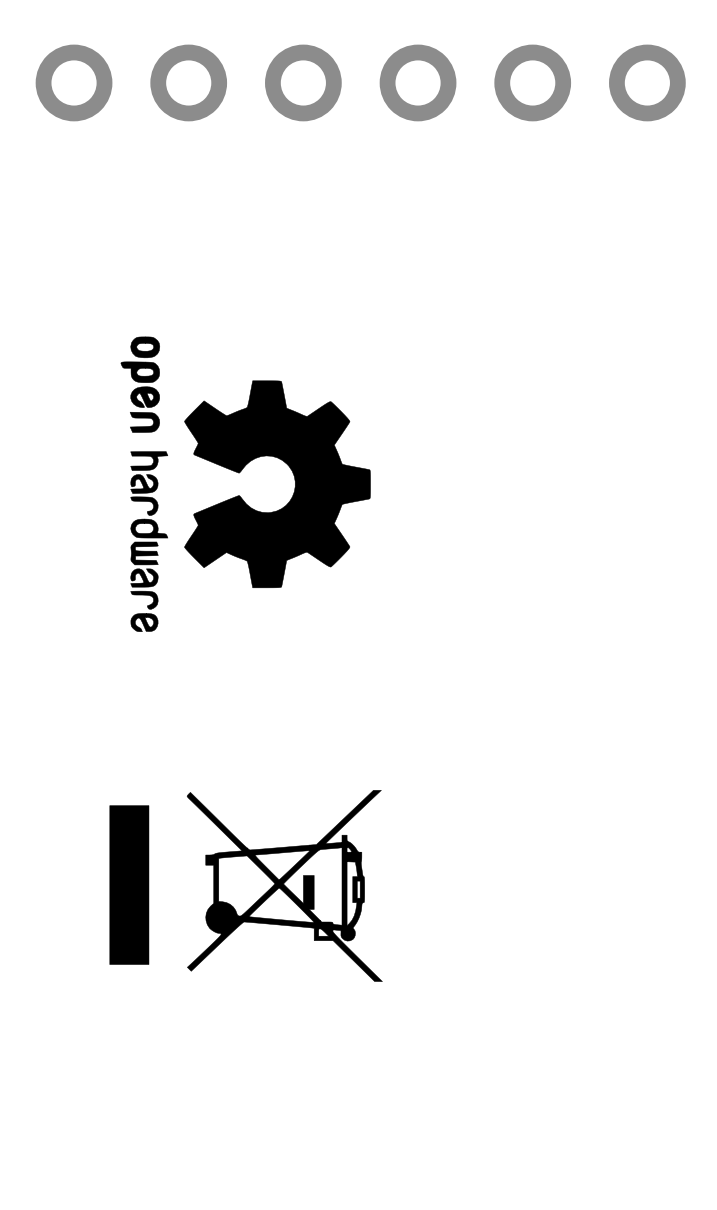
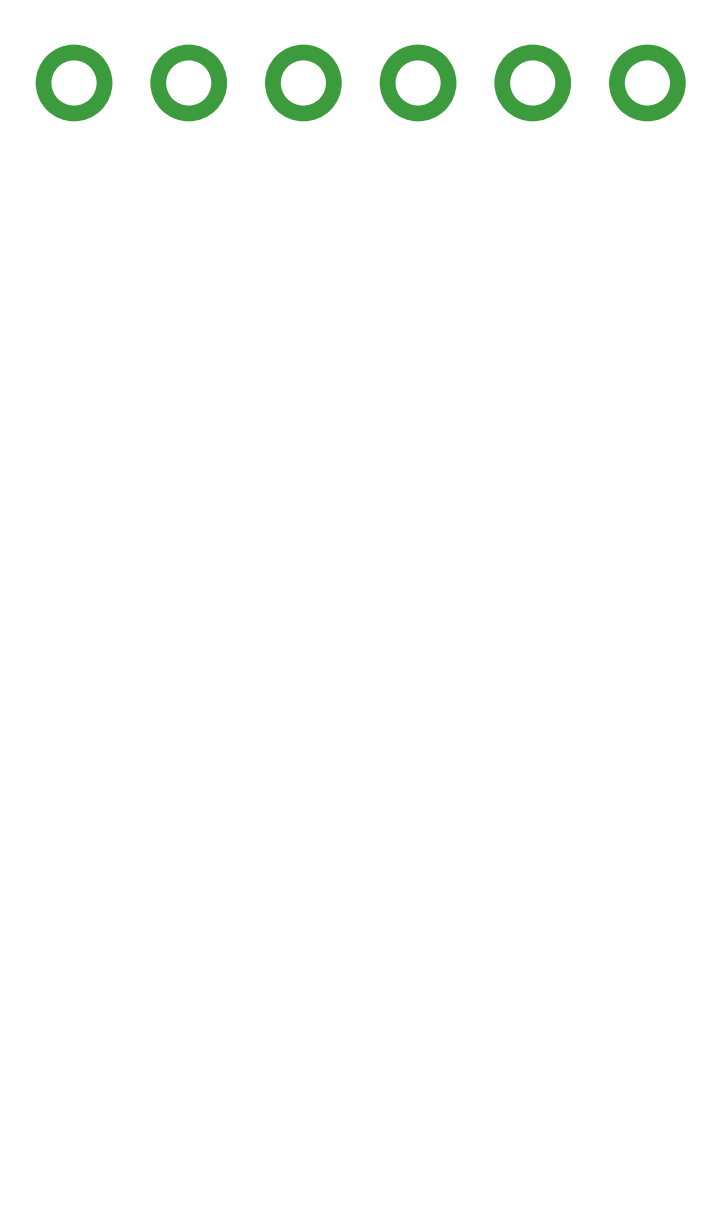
drawing: [120, 336, 371, 632] -> none
drawing: [109, 790, 383, 982] -> none

